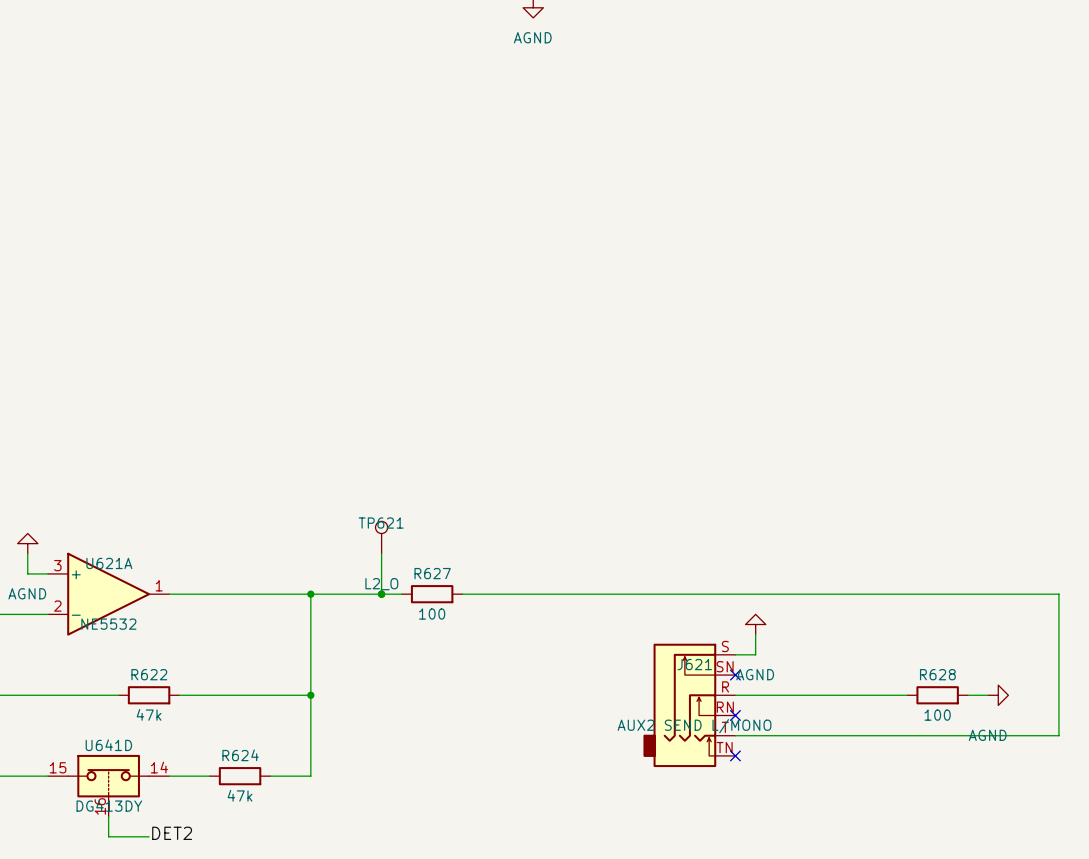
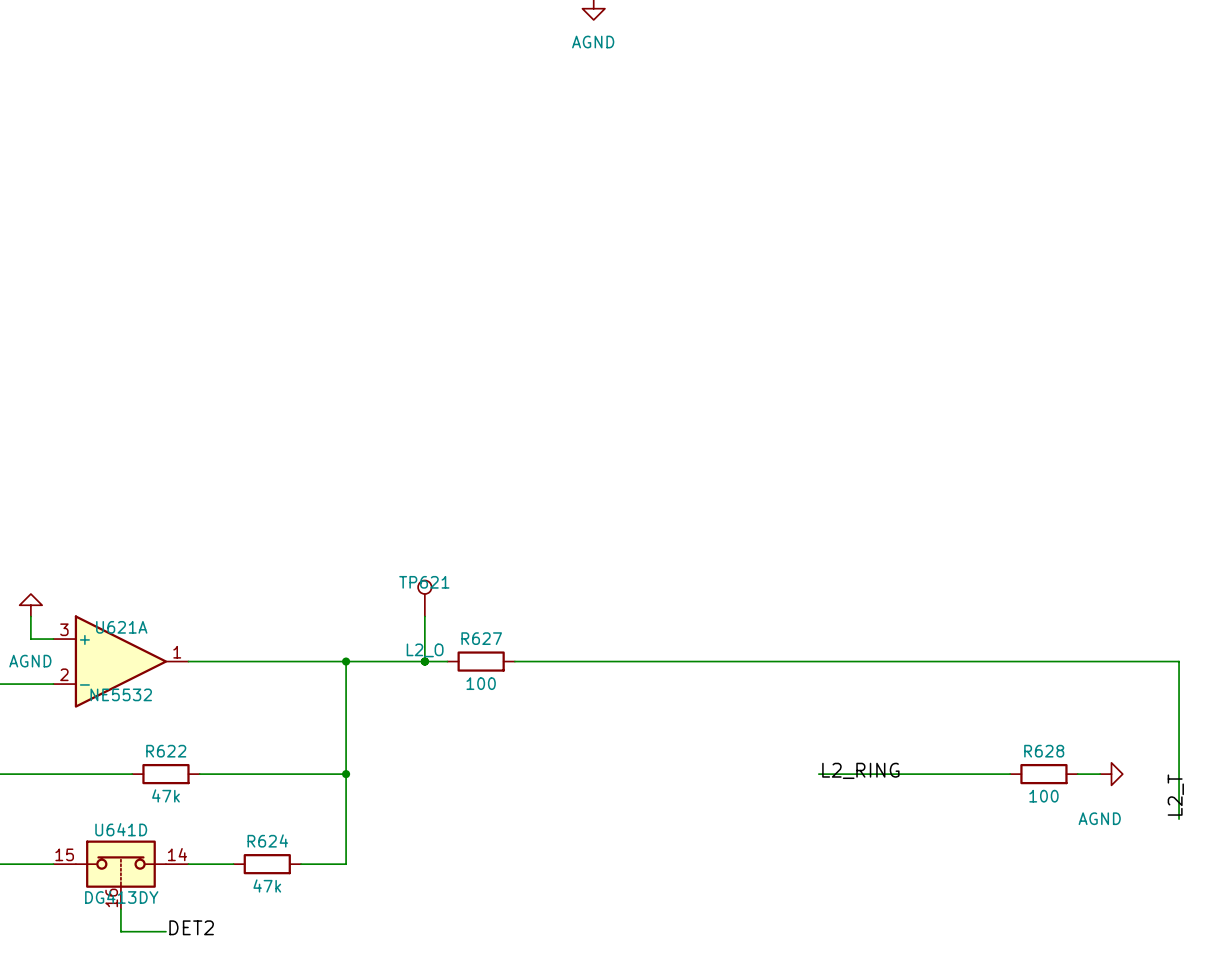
power symbol: AGND (755, 624) -> none
wire: (755, 634) (755, 654) (735, 654) -> none
no-connect mark: (735, 675) -> none
label: none -> L2_RING (860, 770)
J621: AUX2 SEND L/MONO (689, 705) -> none
label: none -> L2_T (1175, 795)
no-connect mark: (735, 715) -> none
wire: (735, 735) (1058, 735) -> none
no-connect mark: (735, 755) -> none

